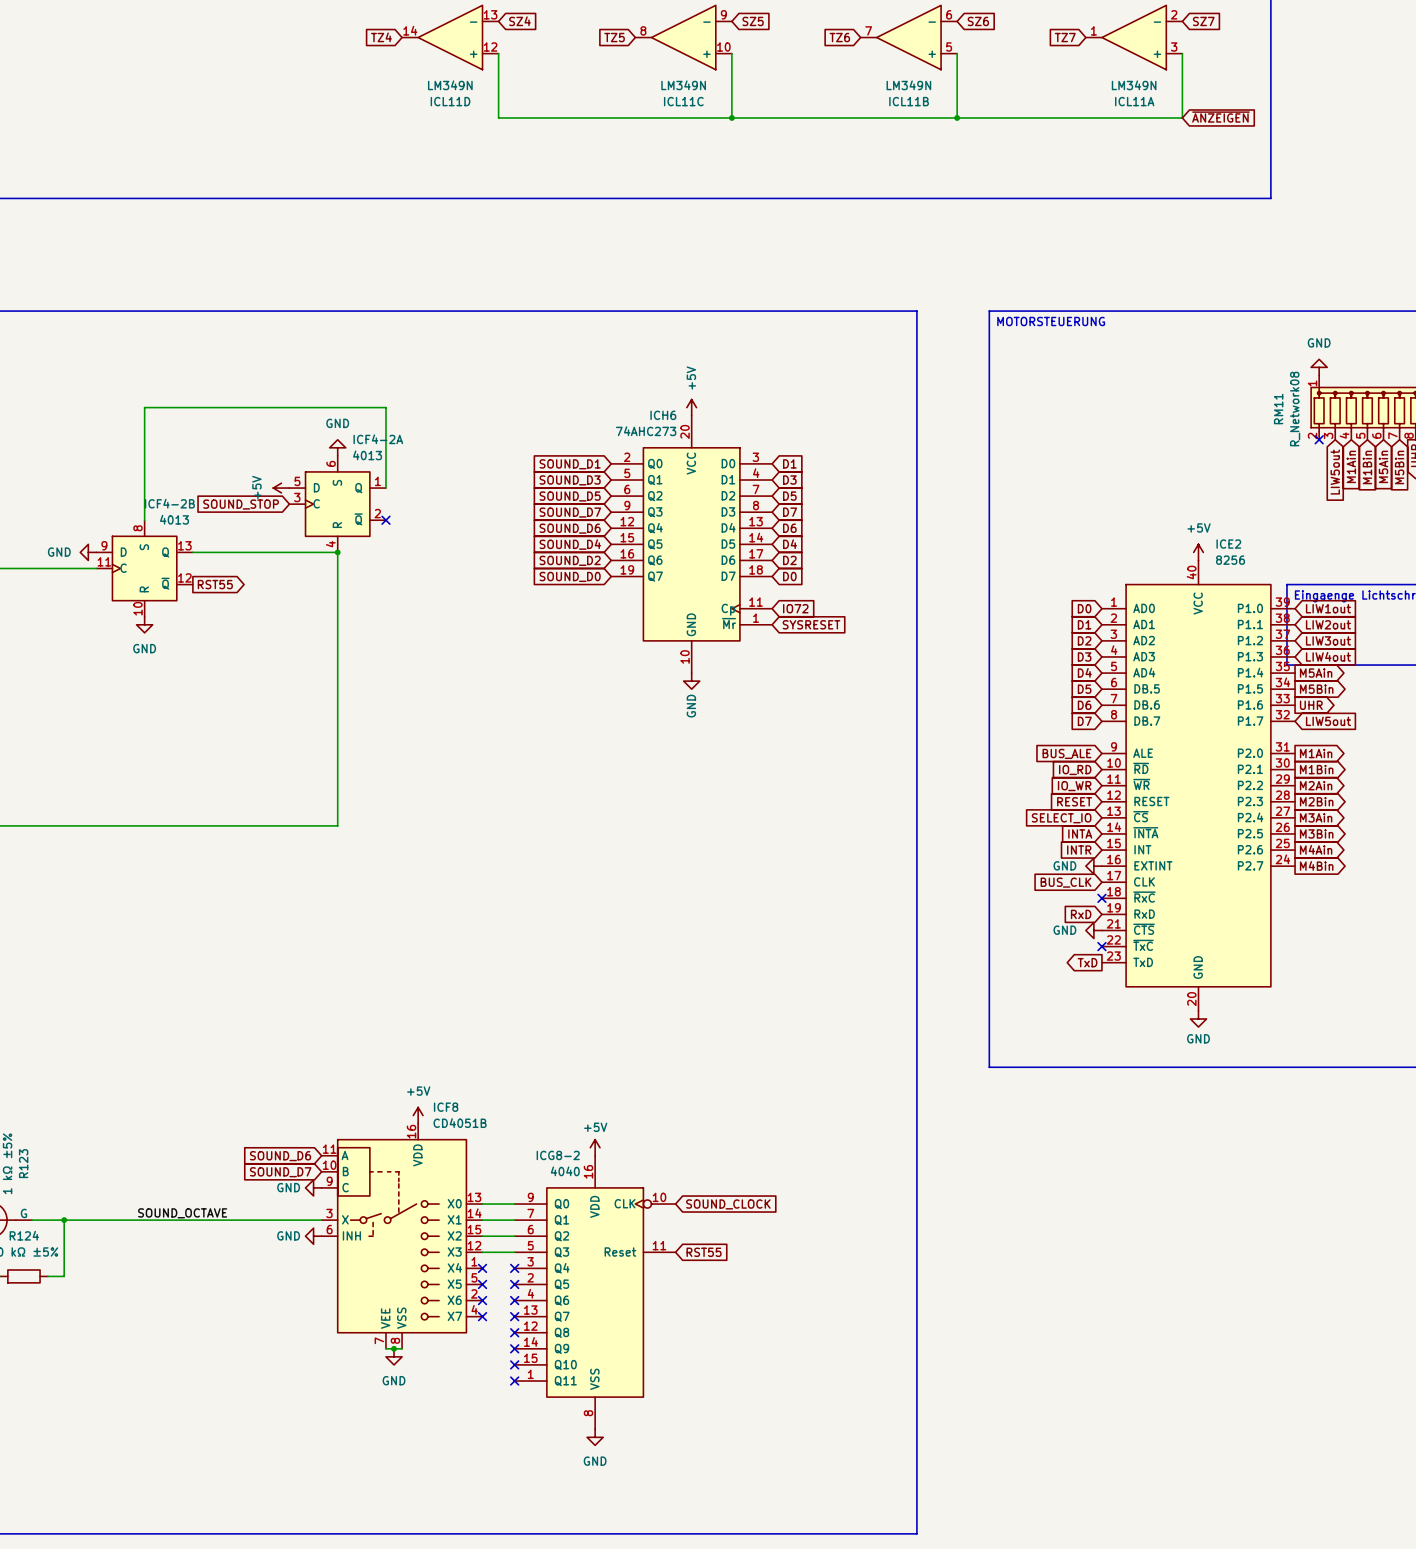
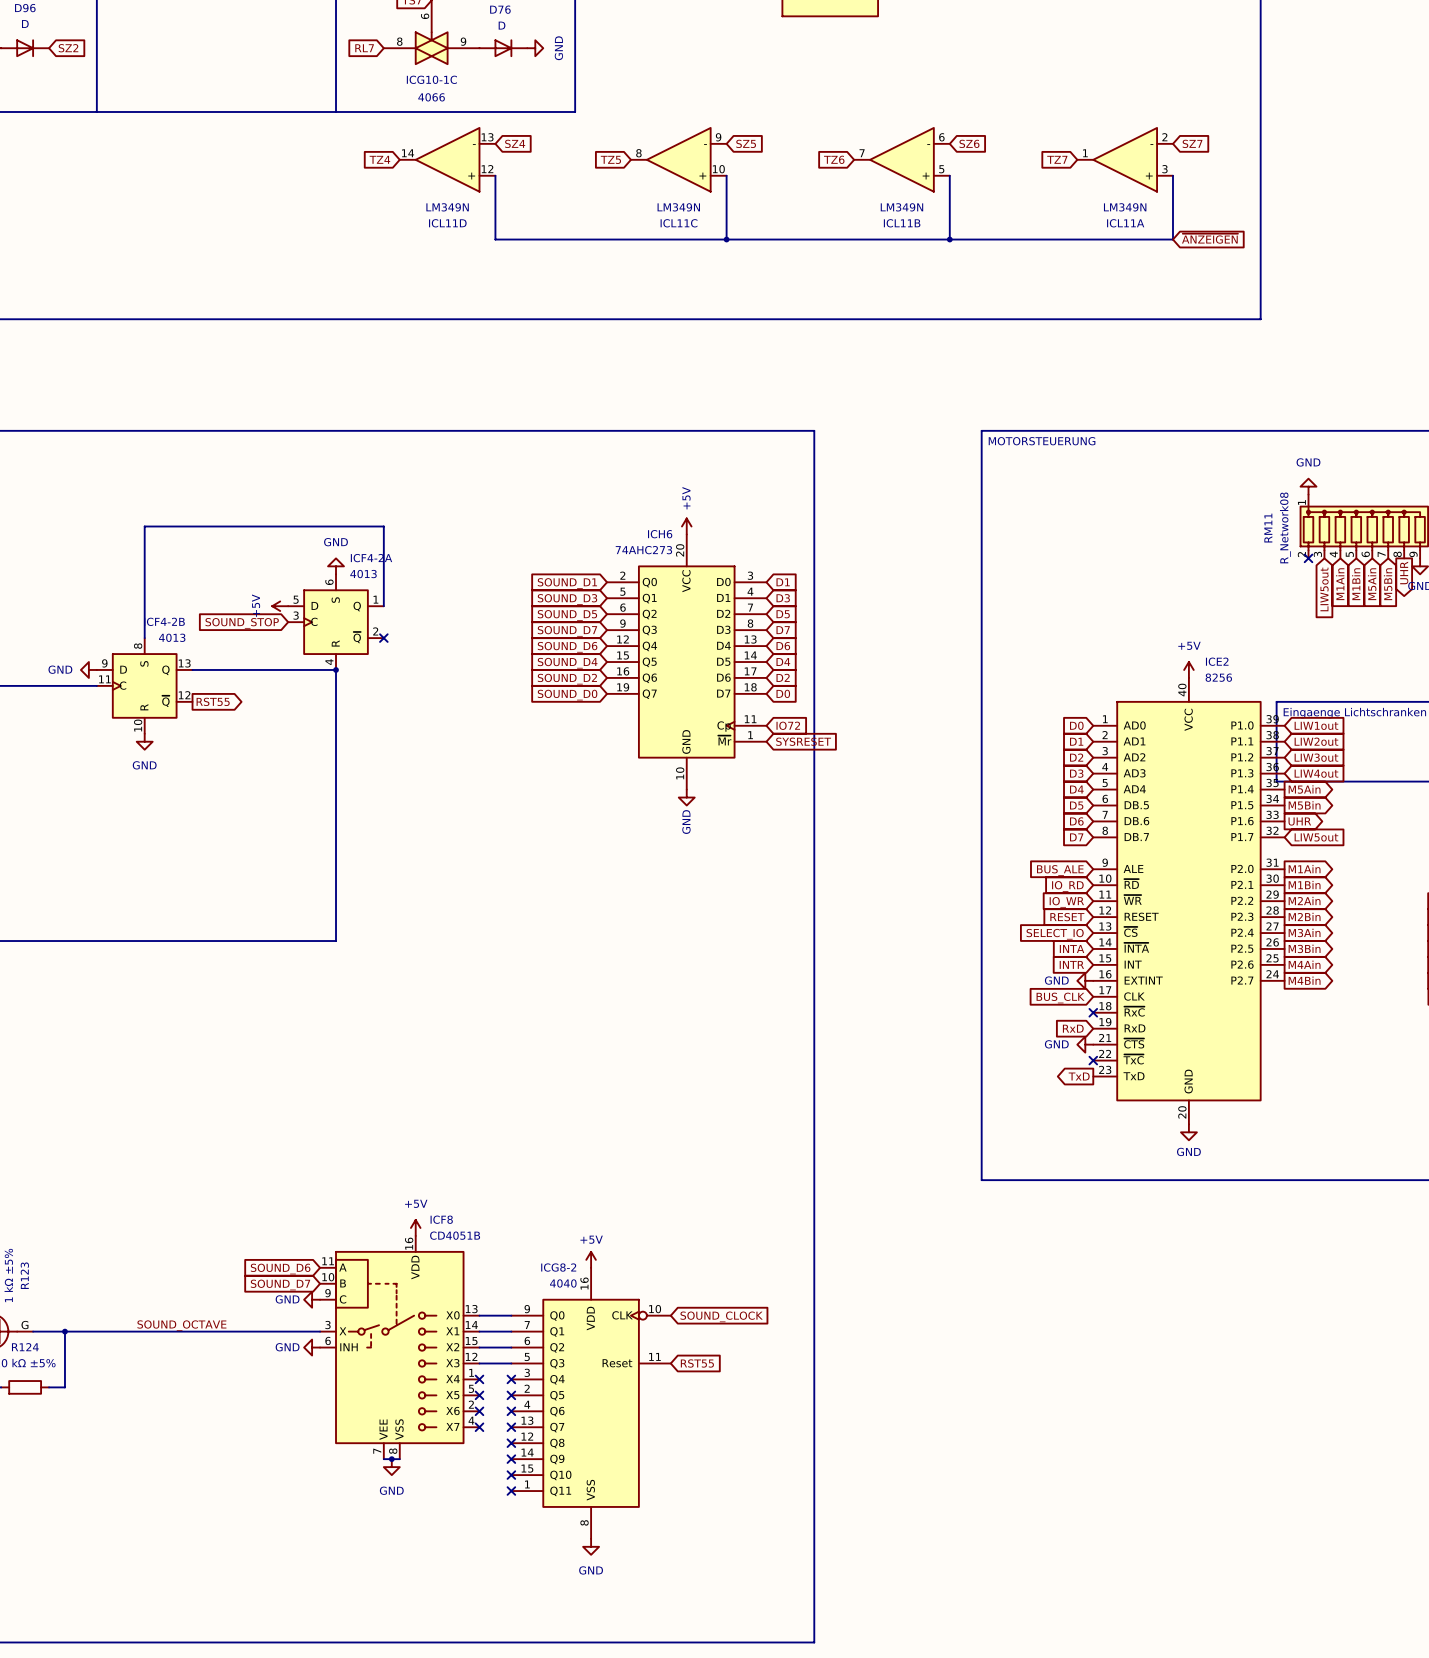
line: (820, 311) (916, 311) (916, 1533) (820, 1533) -> (814, 430) (814, 1642)

